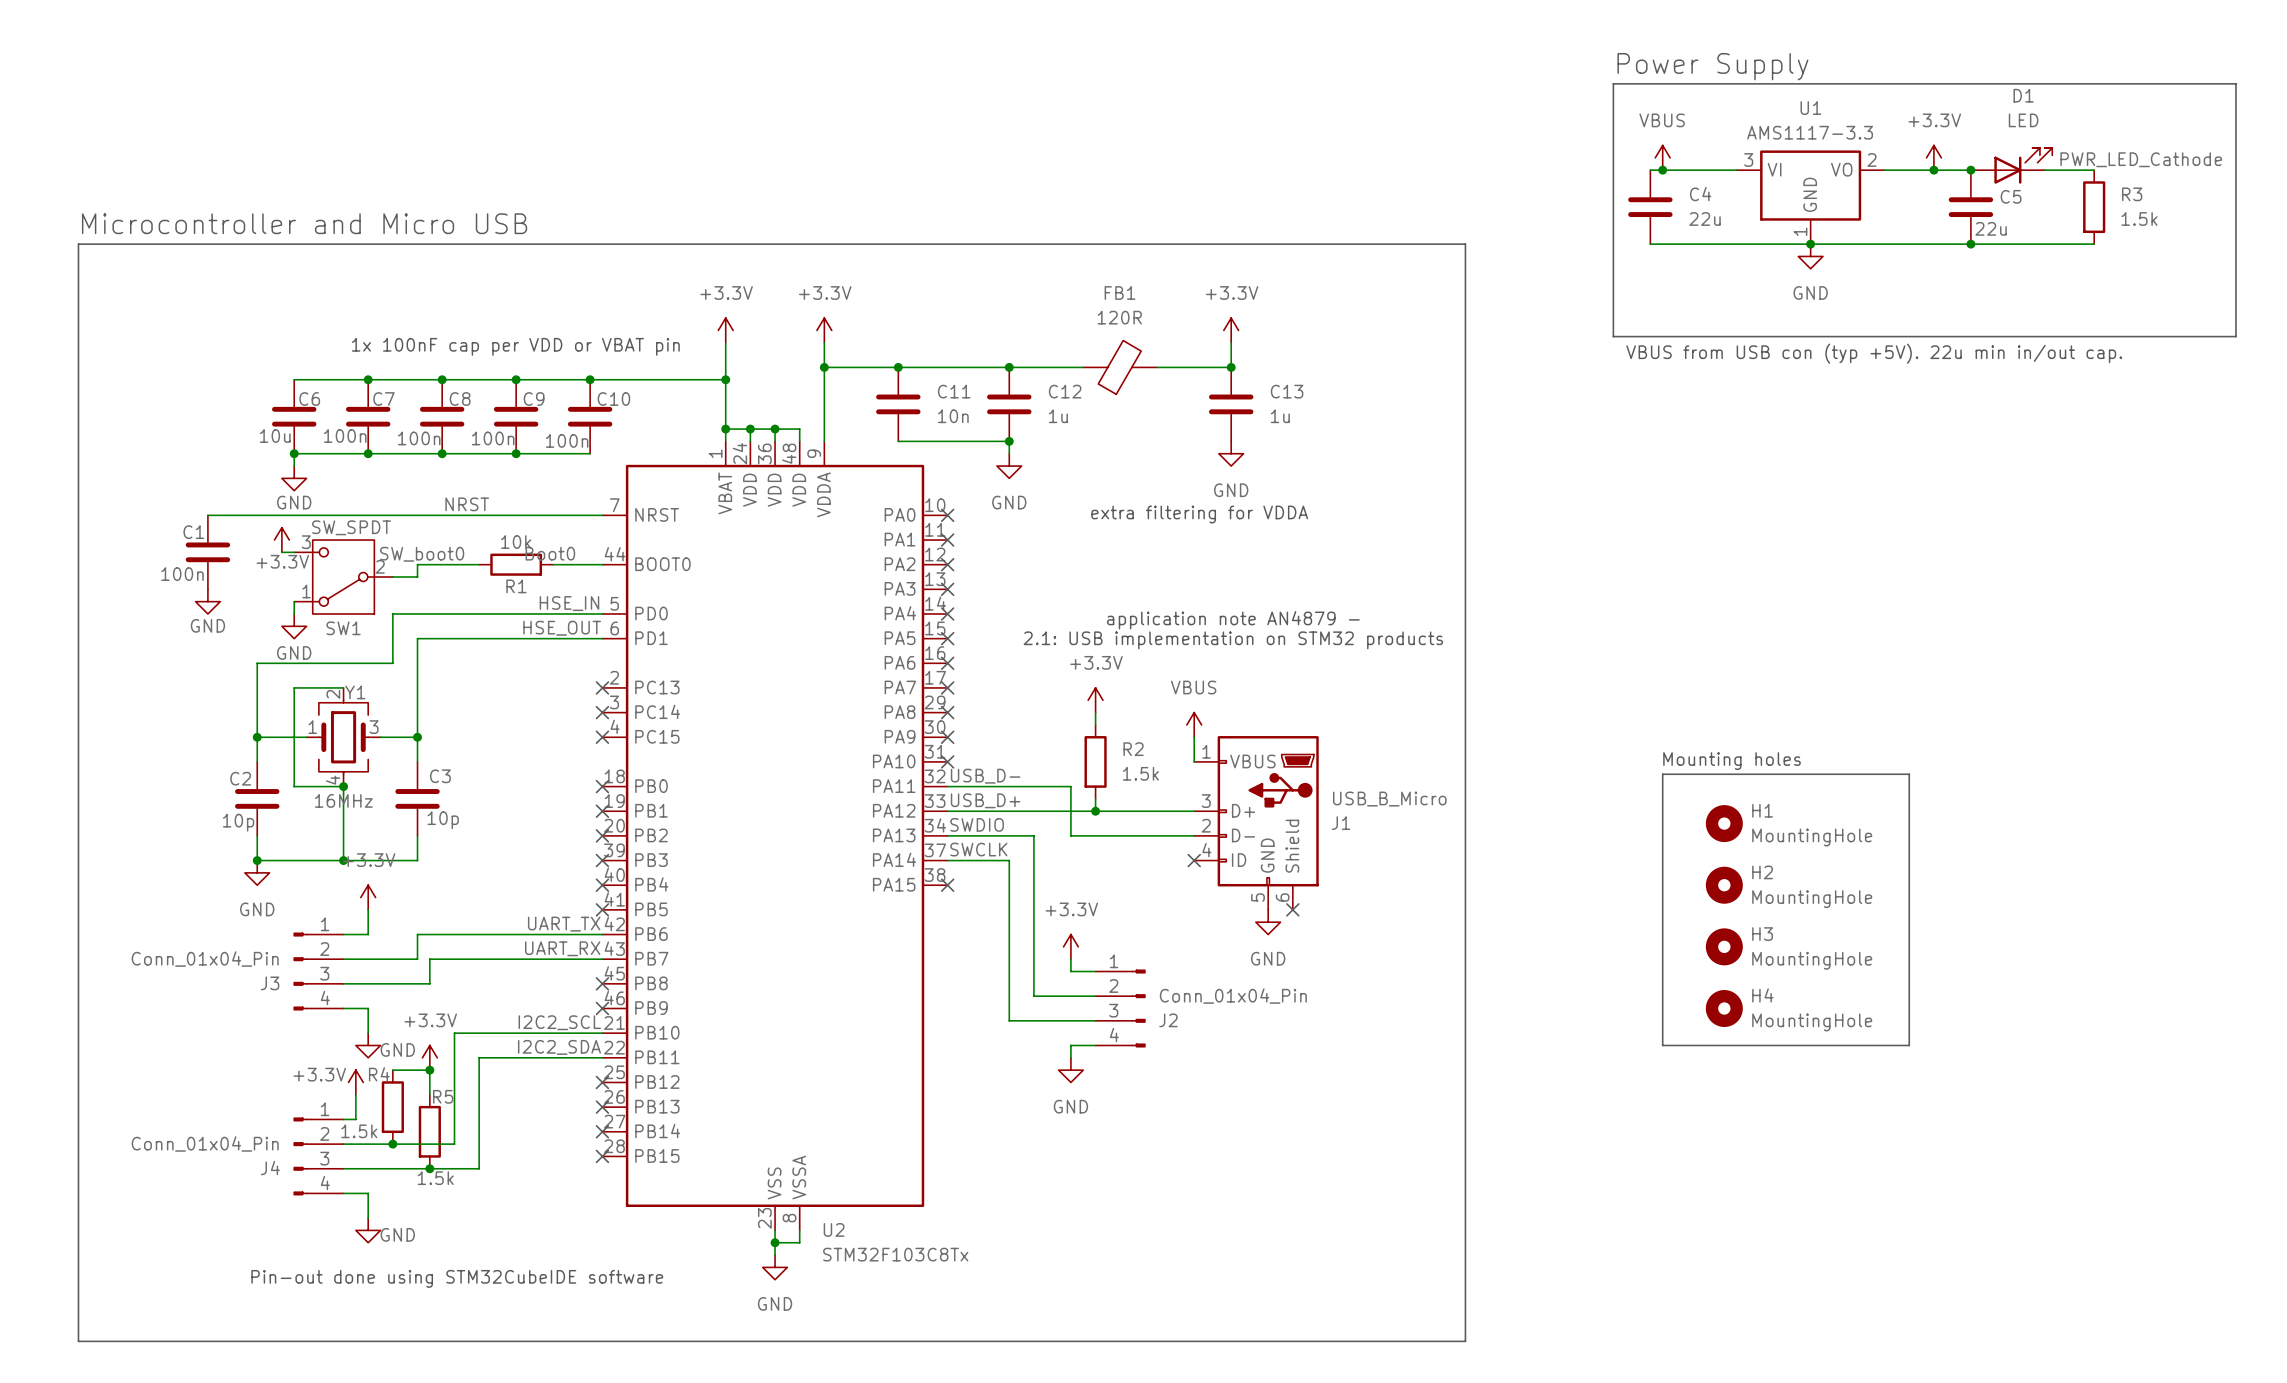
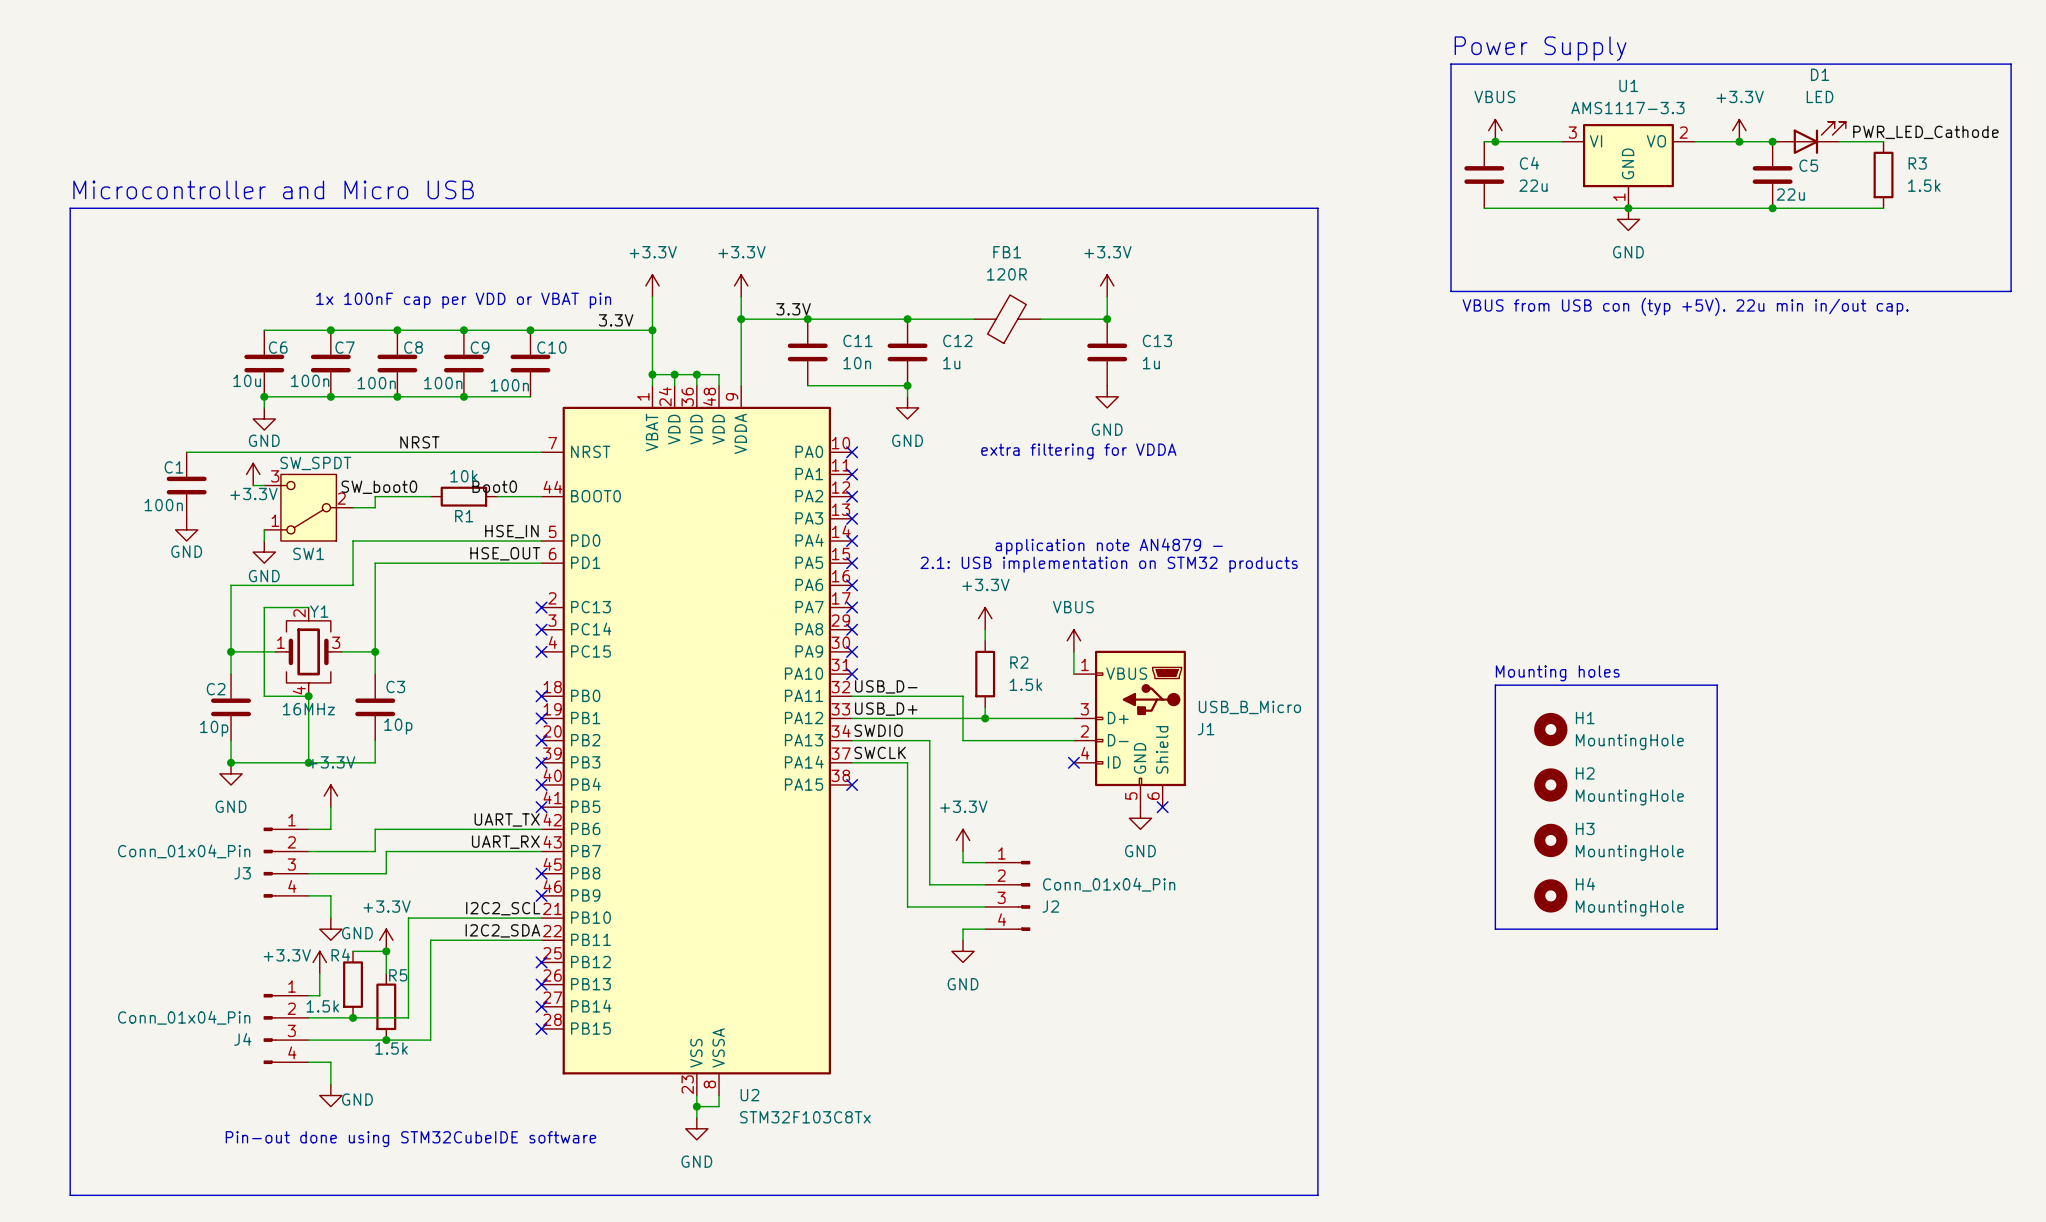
label: none -> 3.3V (793, 309)
label: none -> 3.3V (616, 320)

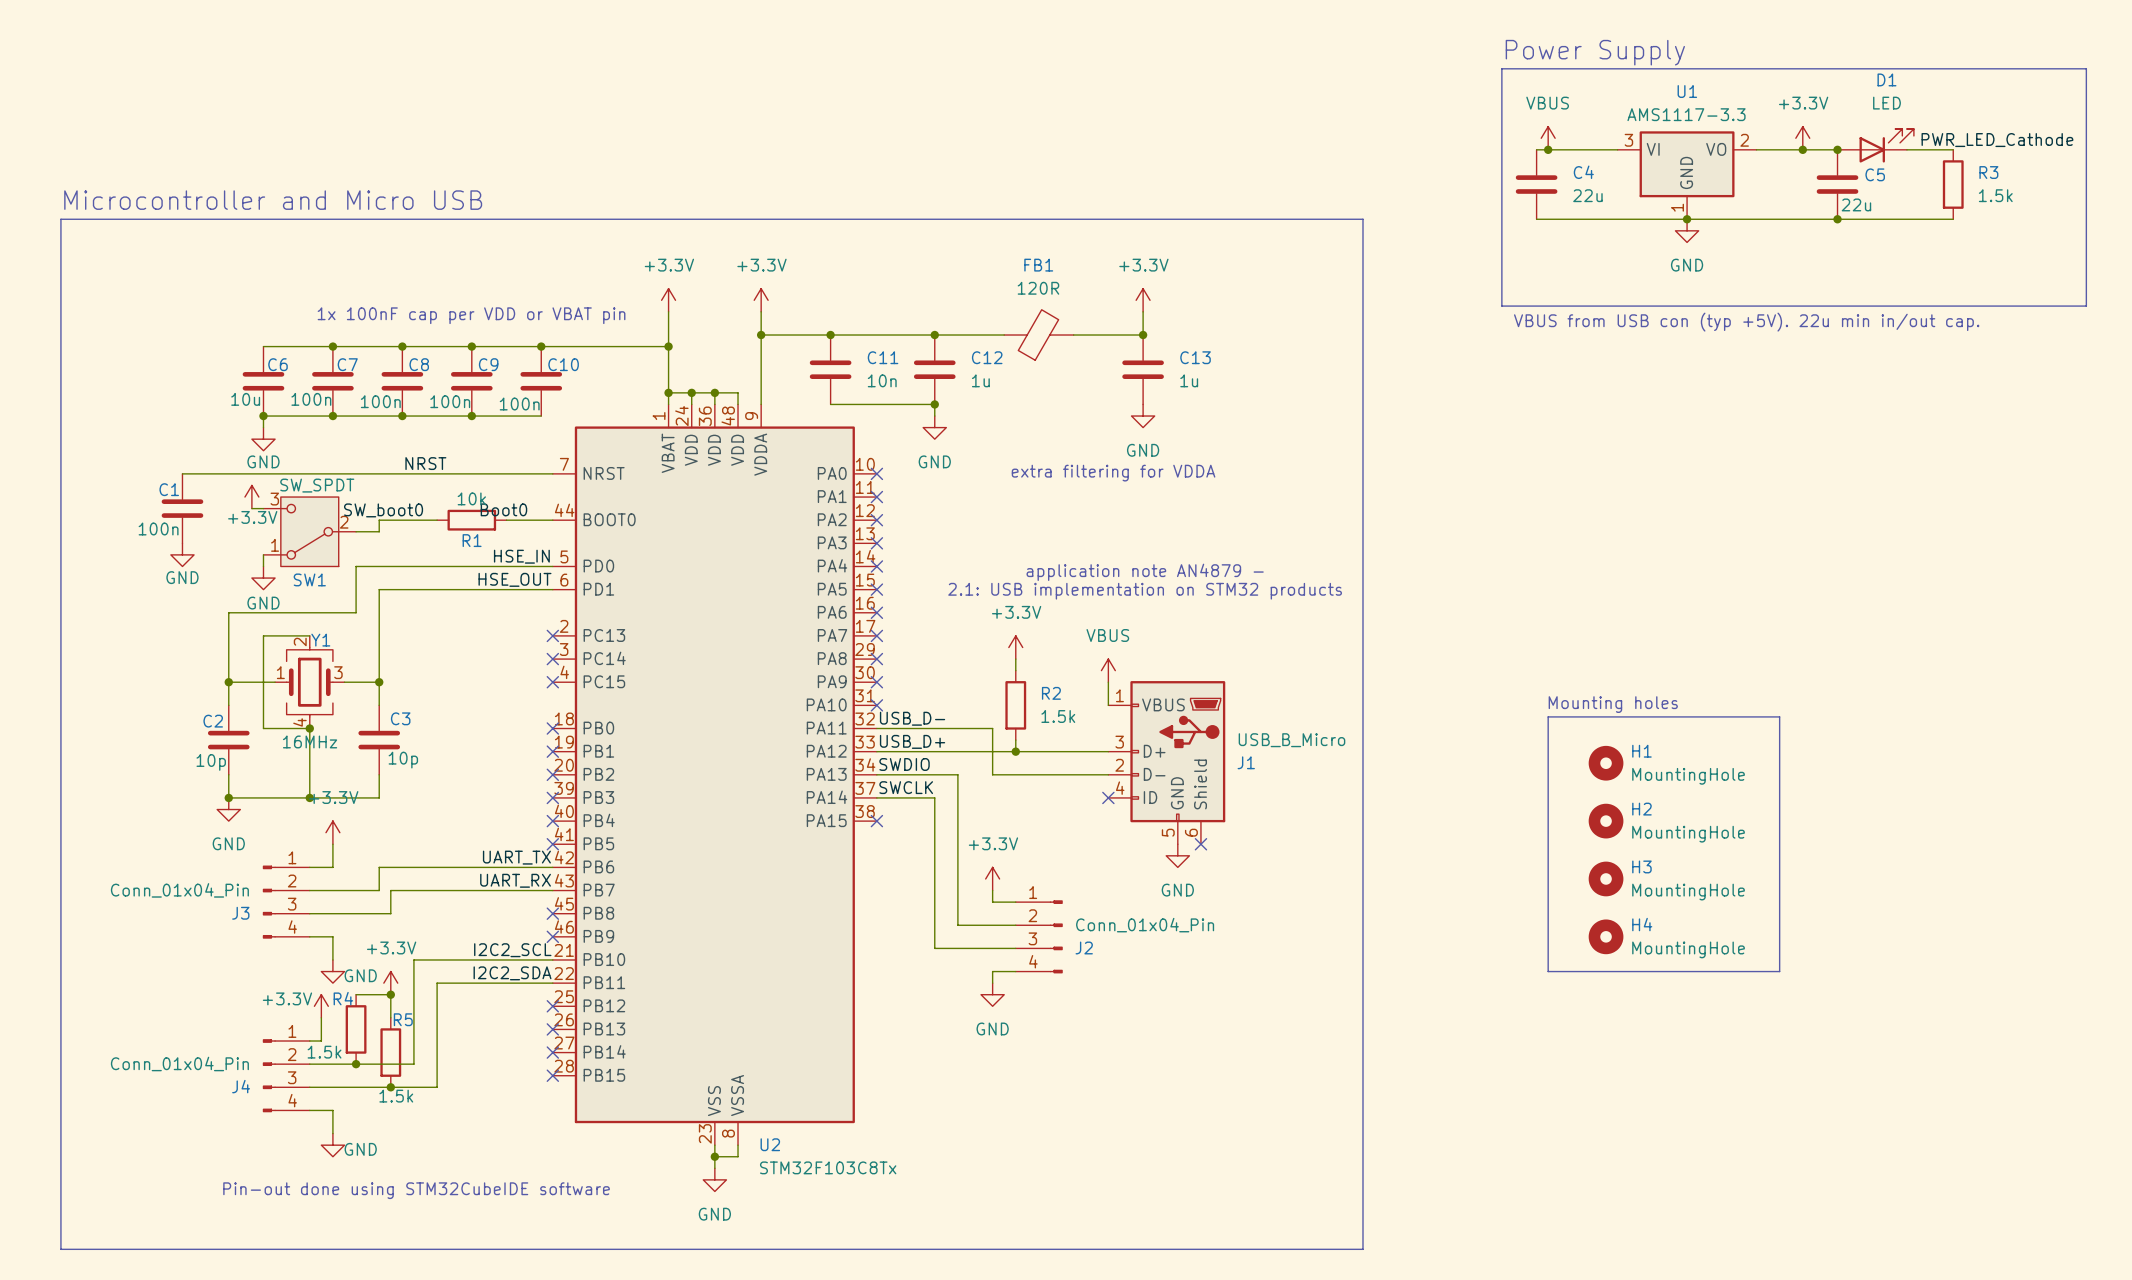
label: 3.3V (793, 309) -> none
label: 3.3V (616, 320) -> none

